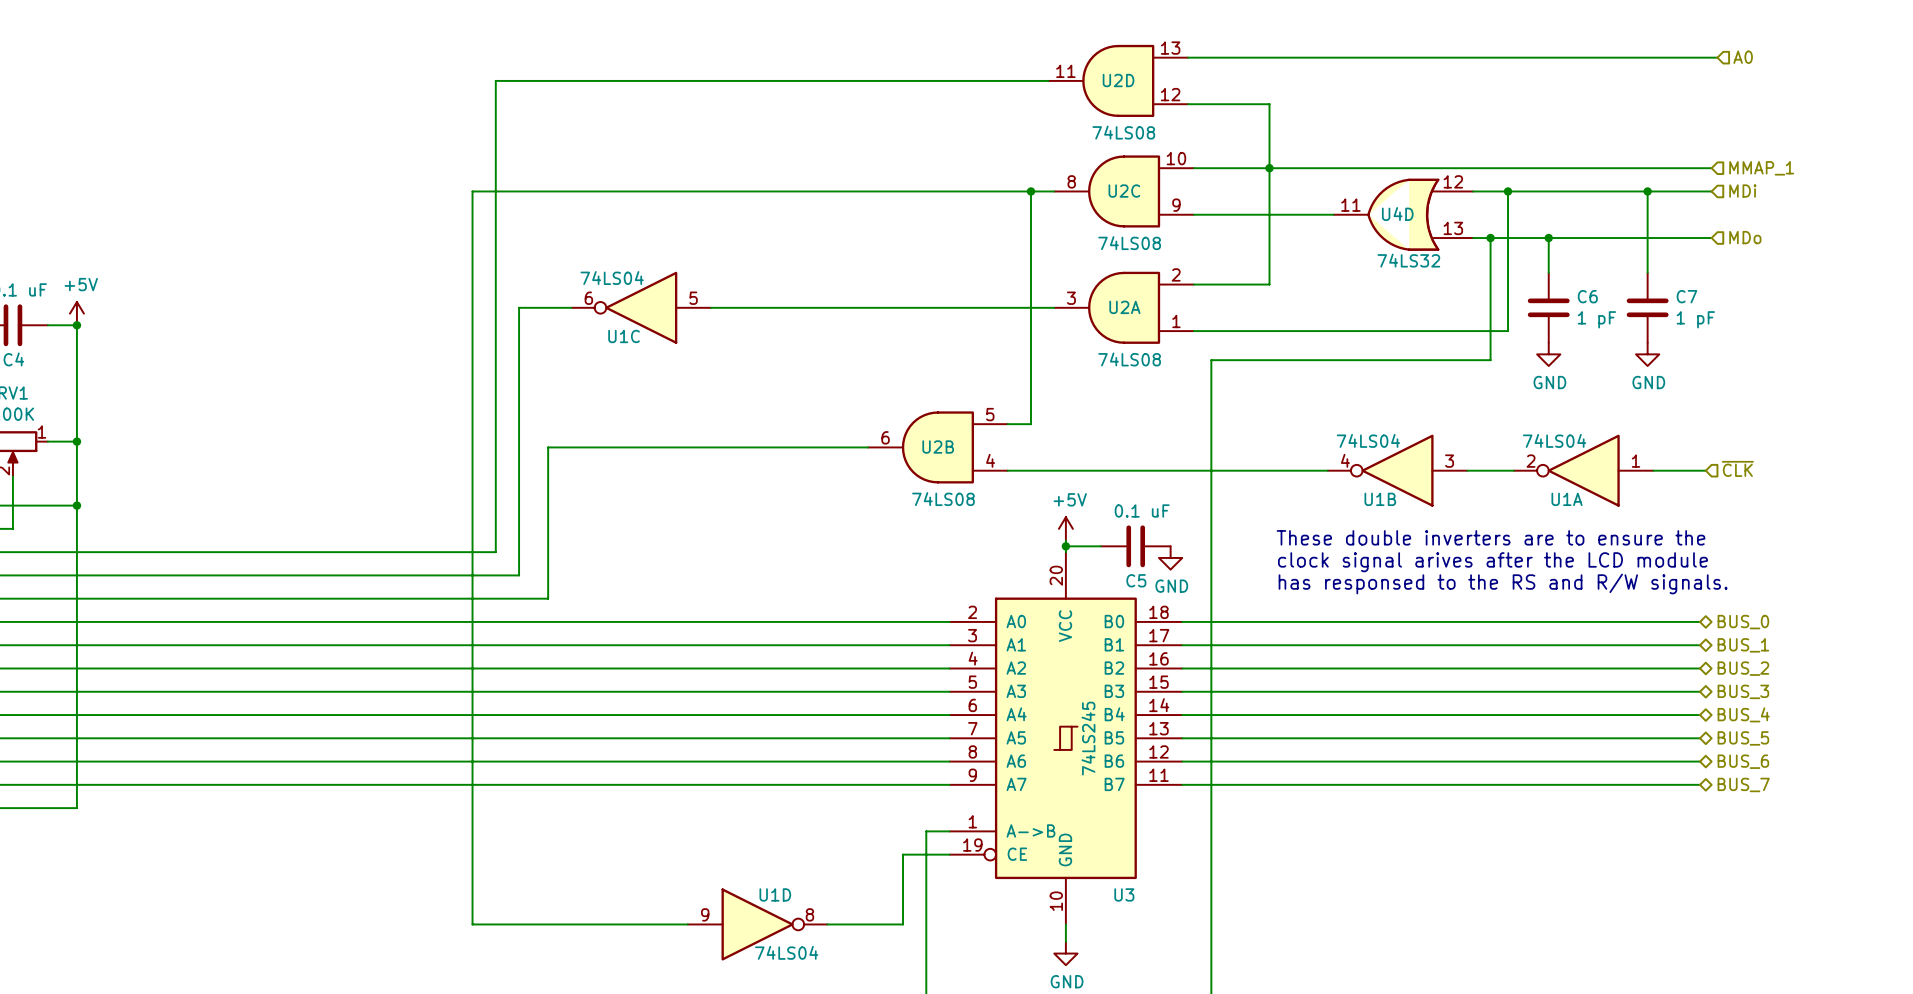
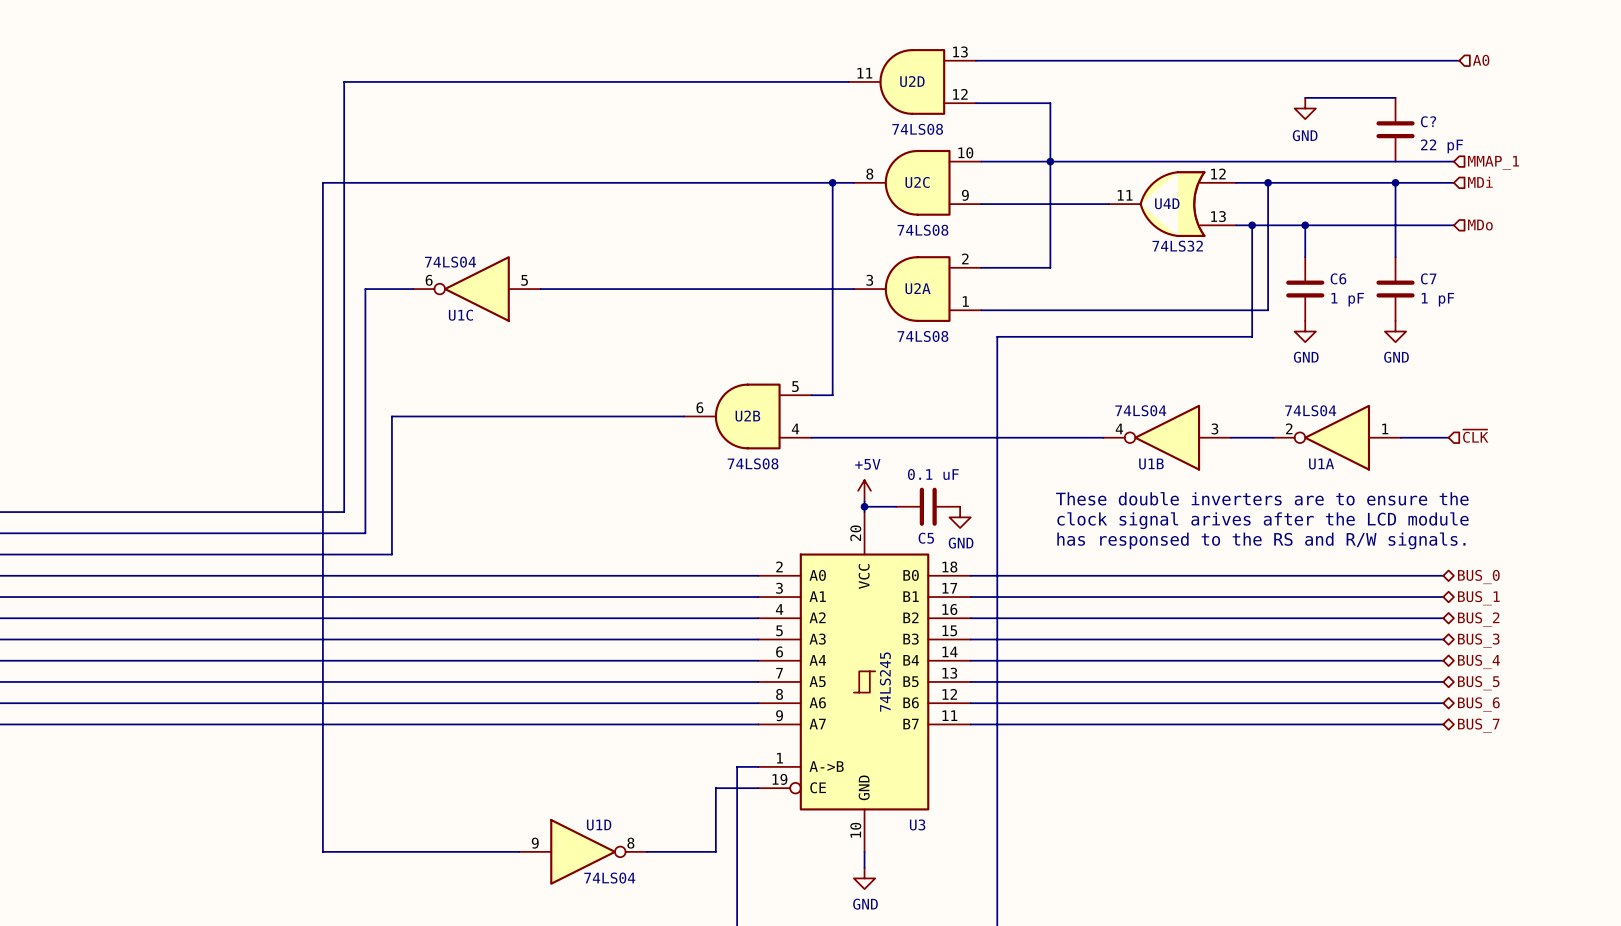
wire: none -> (1305, 97) (1395, 97)
power symbol: none -> GND (1305, 108)
C?: none -> 22 pF (1395, 129)

